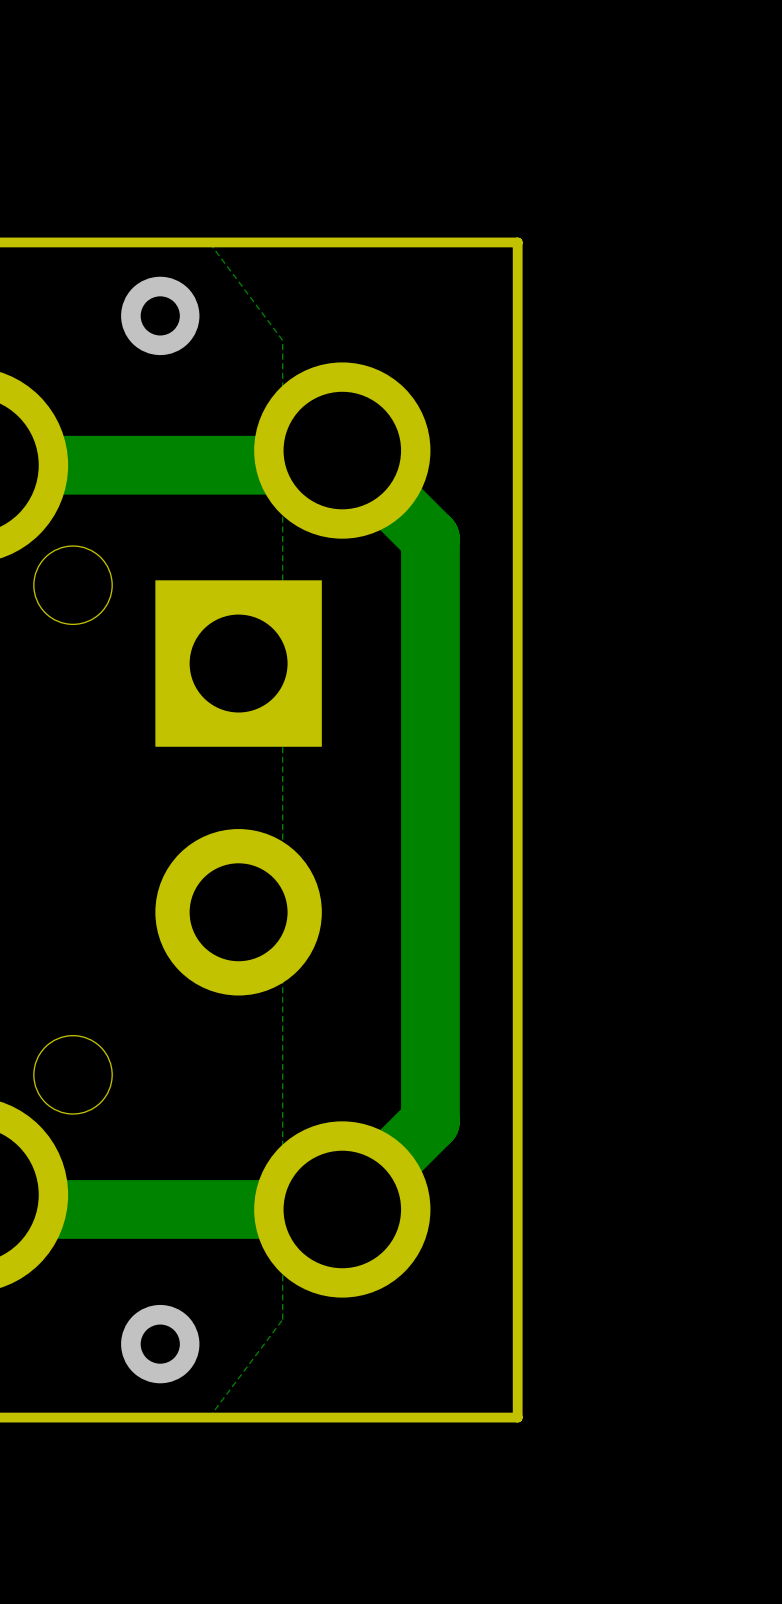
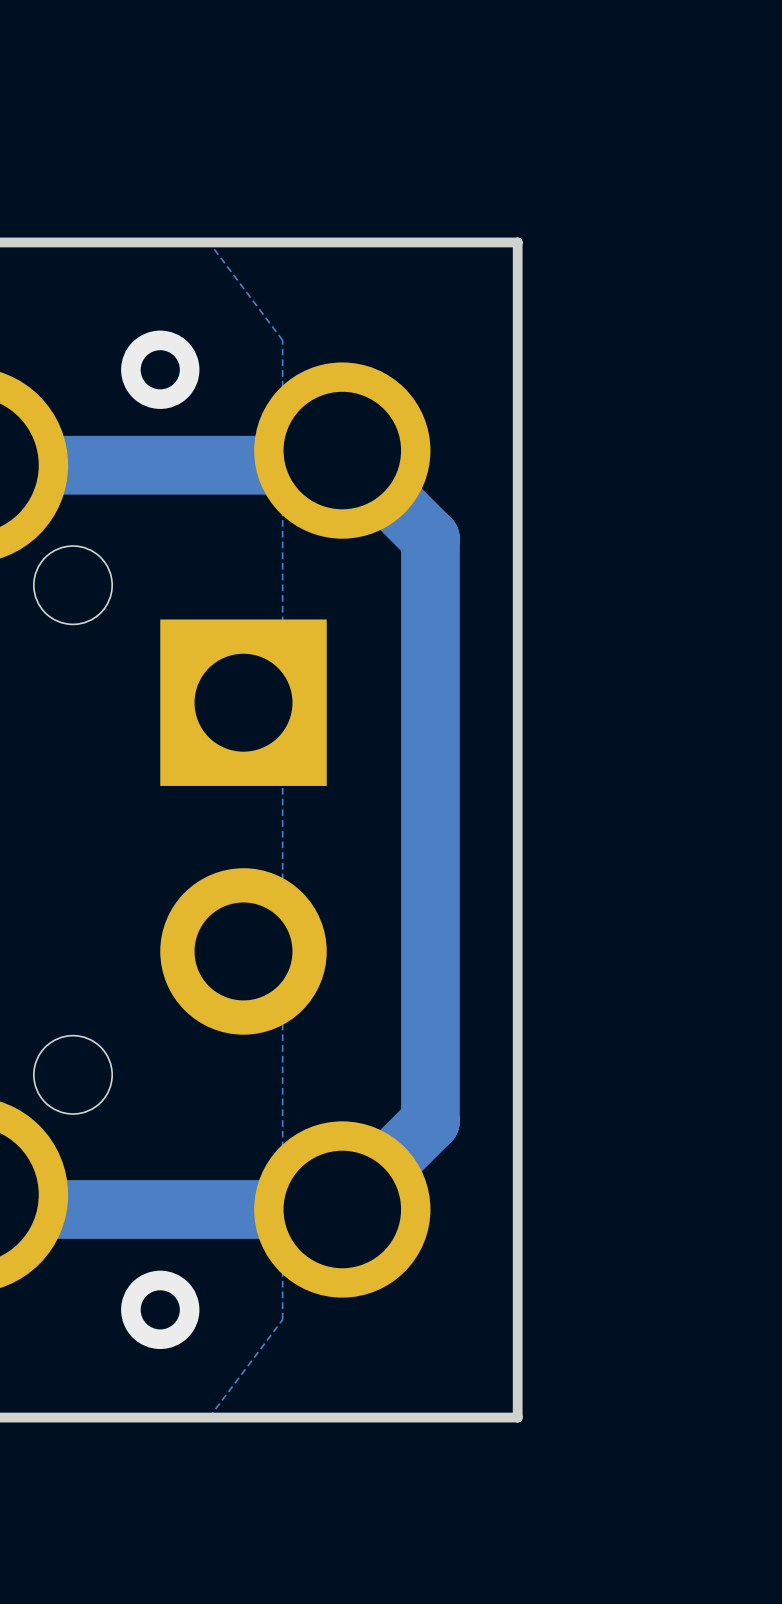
via position: (160, 315) -> (160, 369)
part position: (238, 787) -> (243, 827)
via position: (160, 1344) -> (160, 1309)

